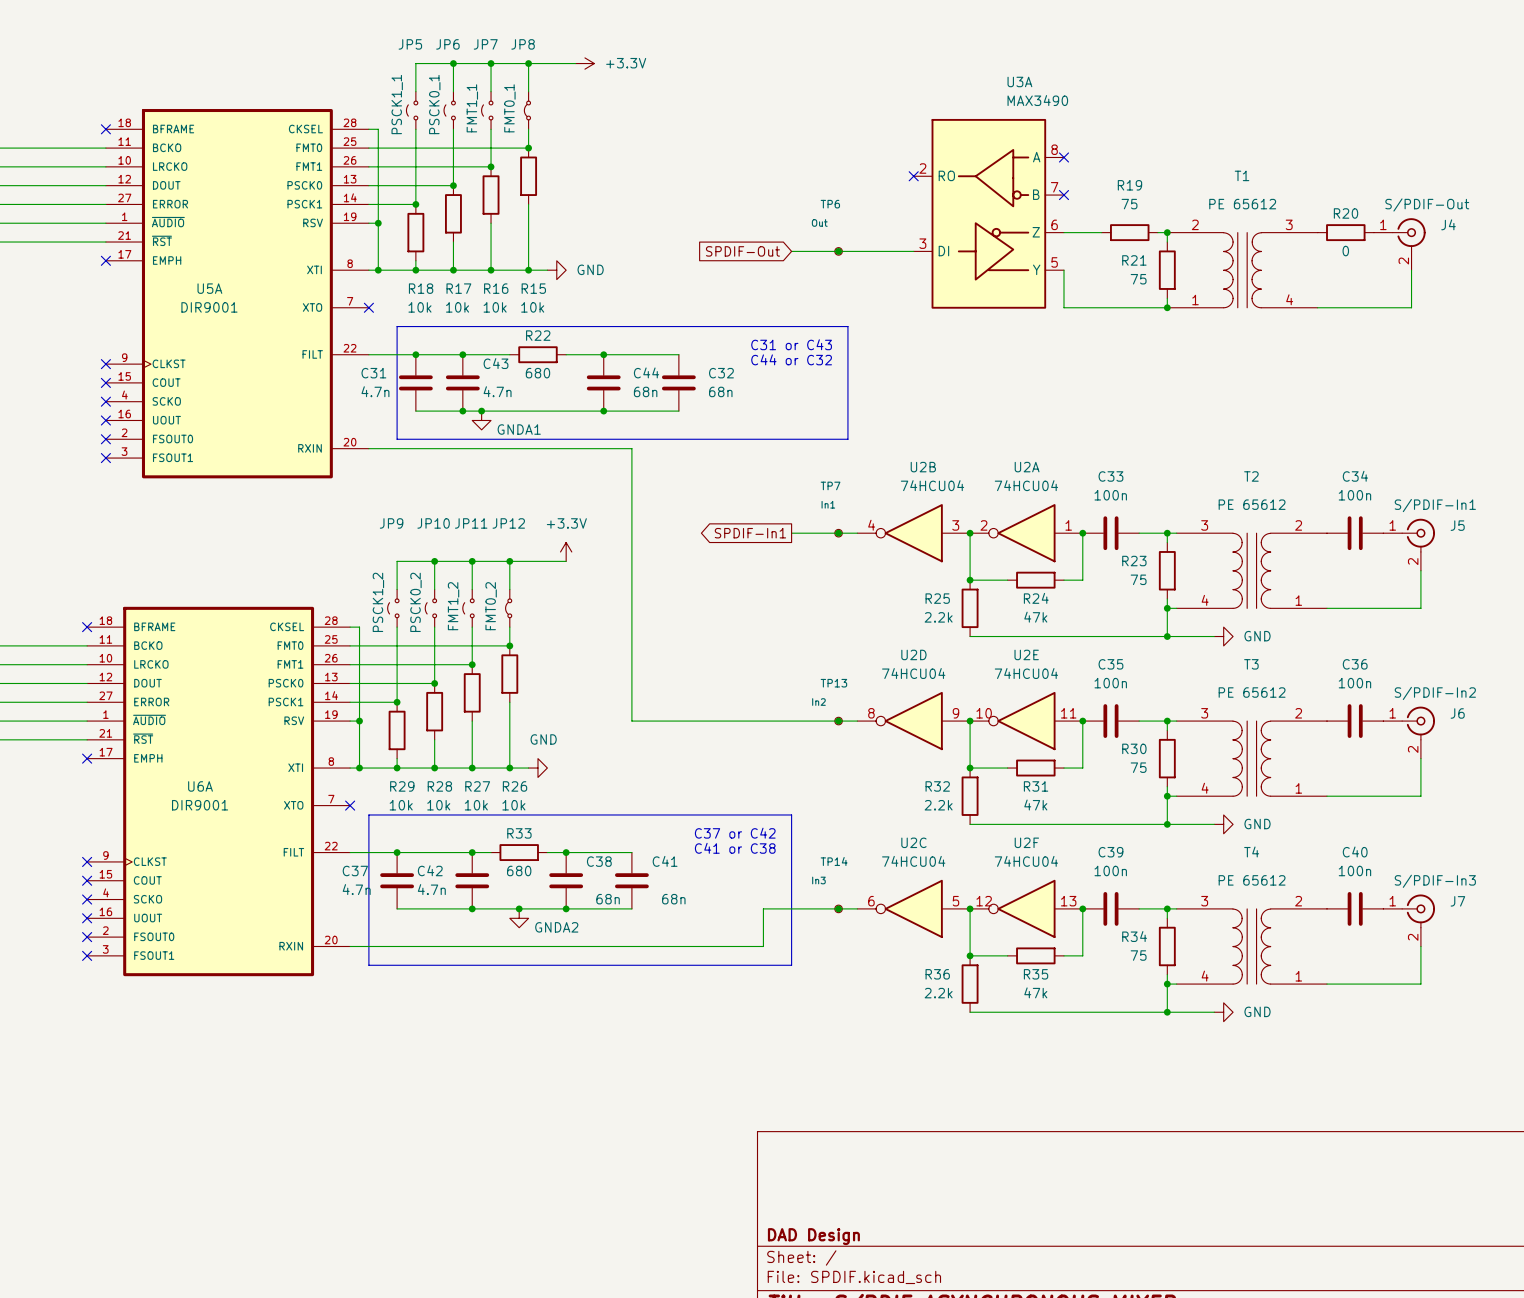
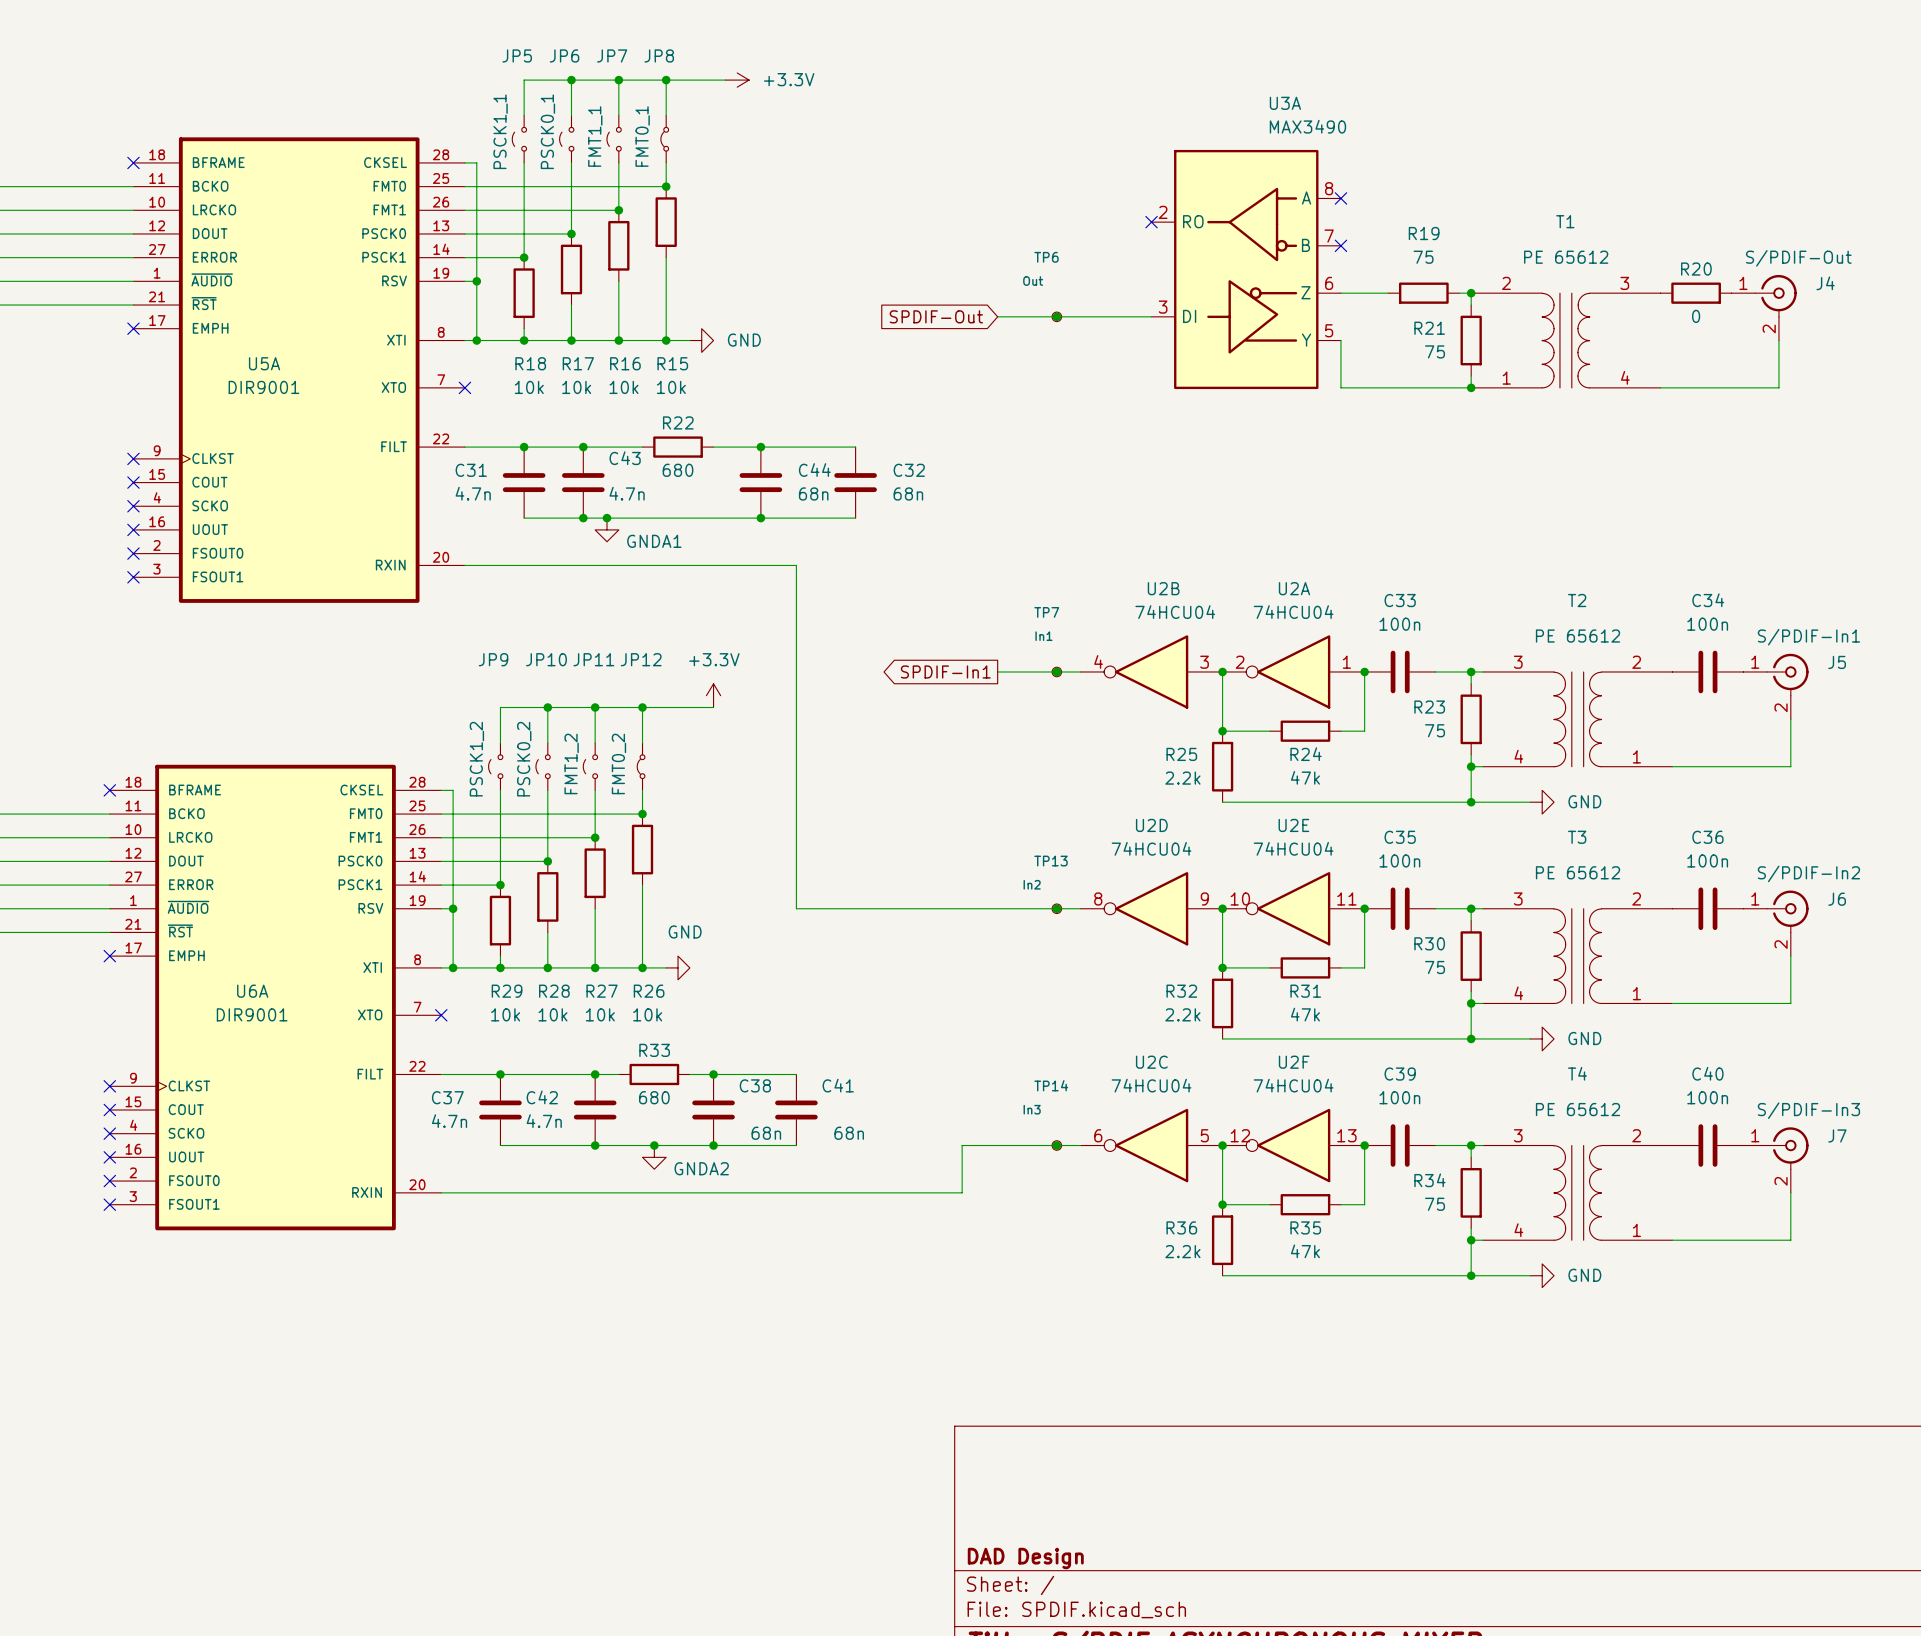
line: (397, 326) (847, 326) (847, 439) (397, 439) (397, 326) -> none
text: C31 or C43 (791, 344) -> none
text: C44 or C32 (791, 359) -> none
line: (368, 814) (791, 814) (791, 965) (368, 965) (368, 814) -> none
text: C37 or C42 (735, 833) -> none
text: C41 or C38 (735, 848) -> none

